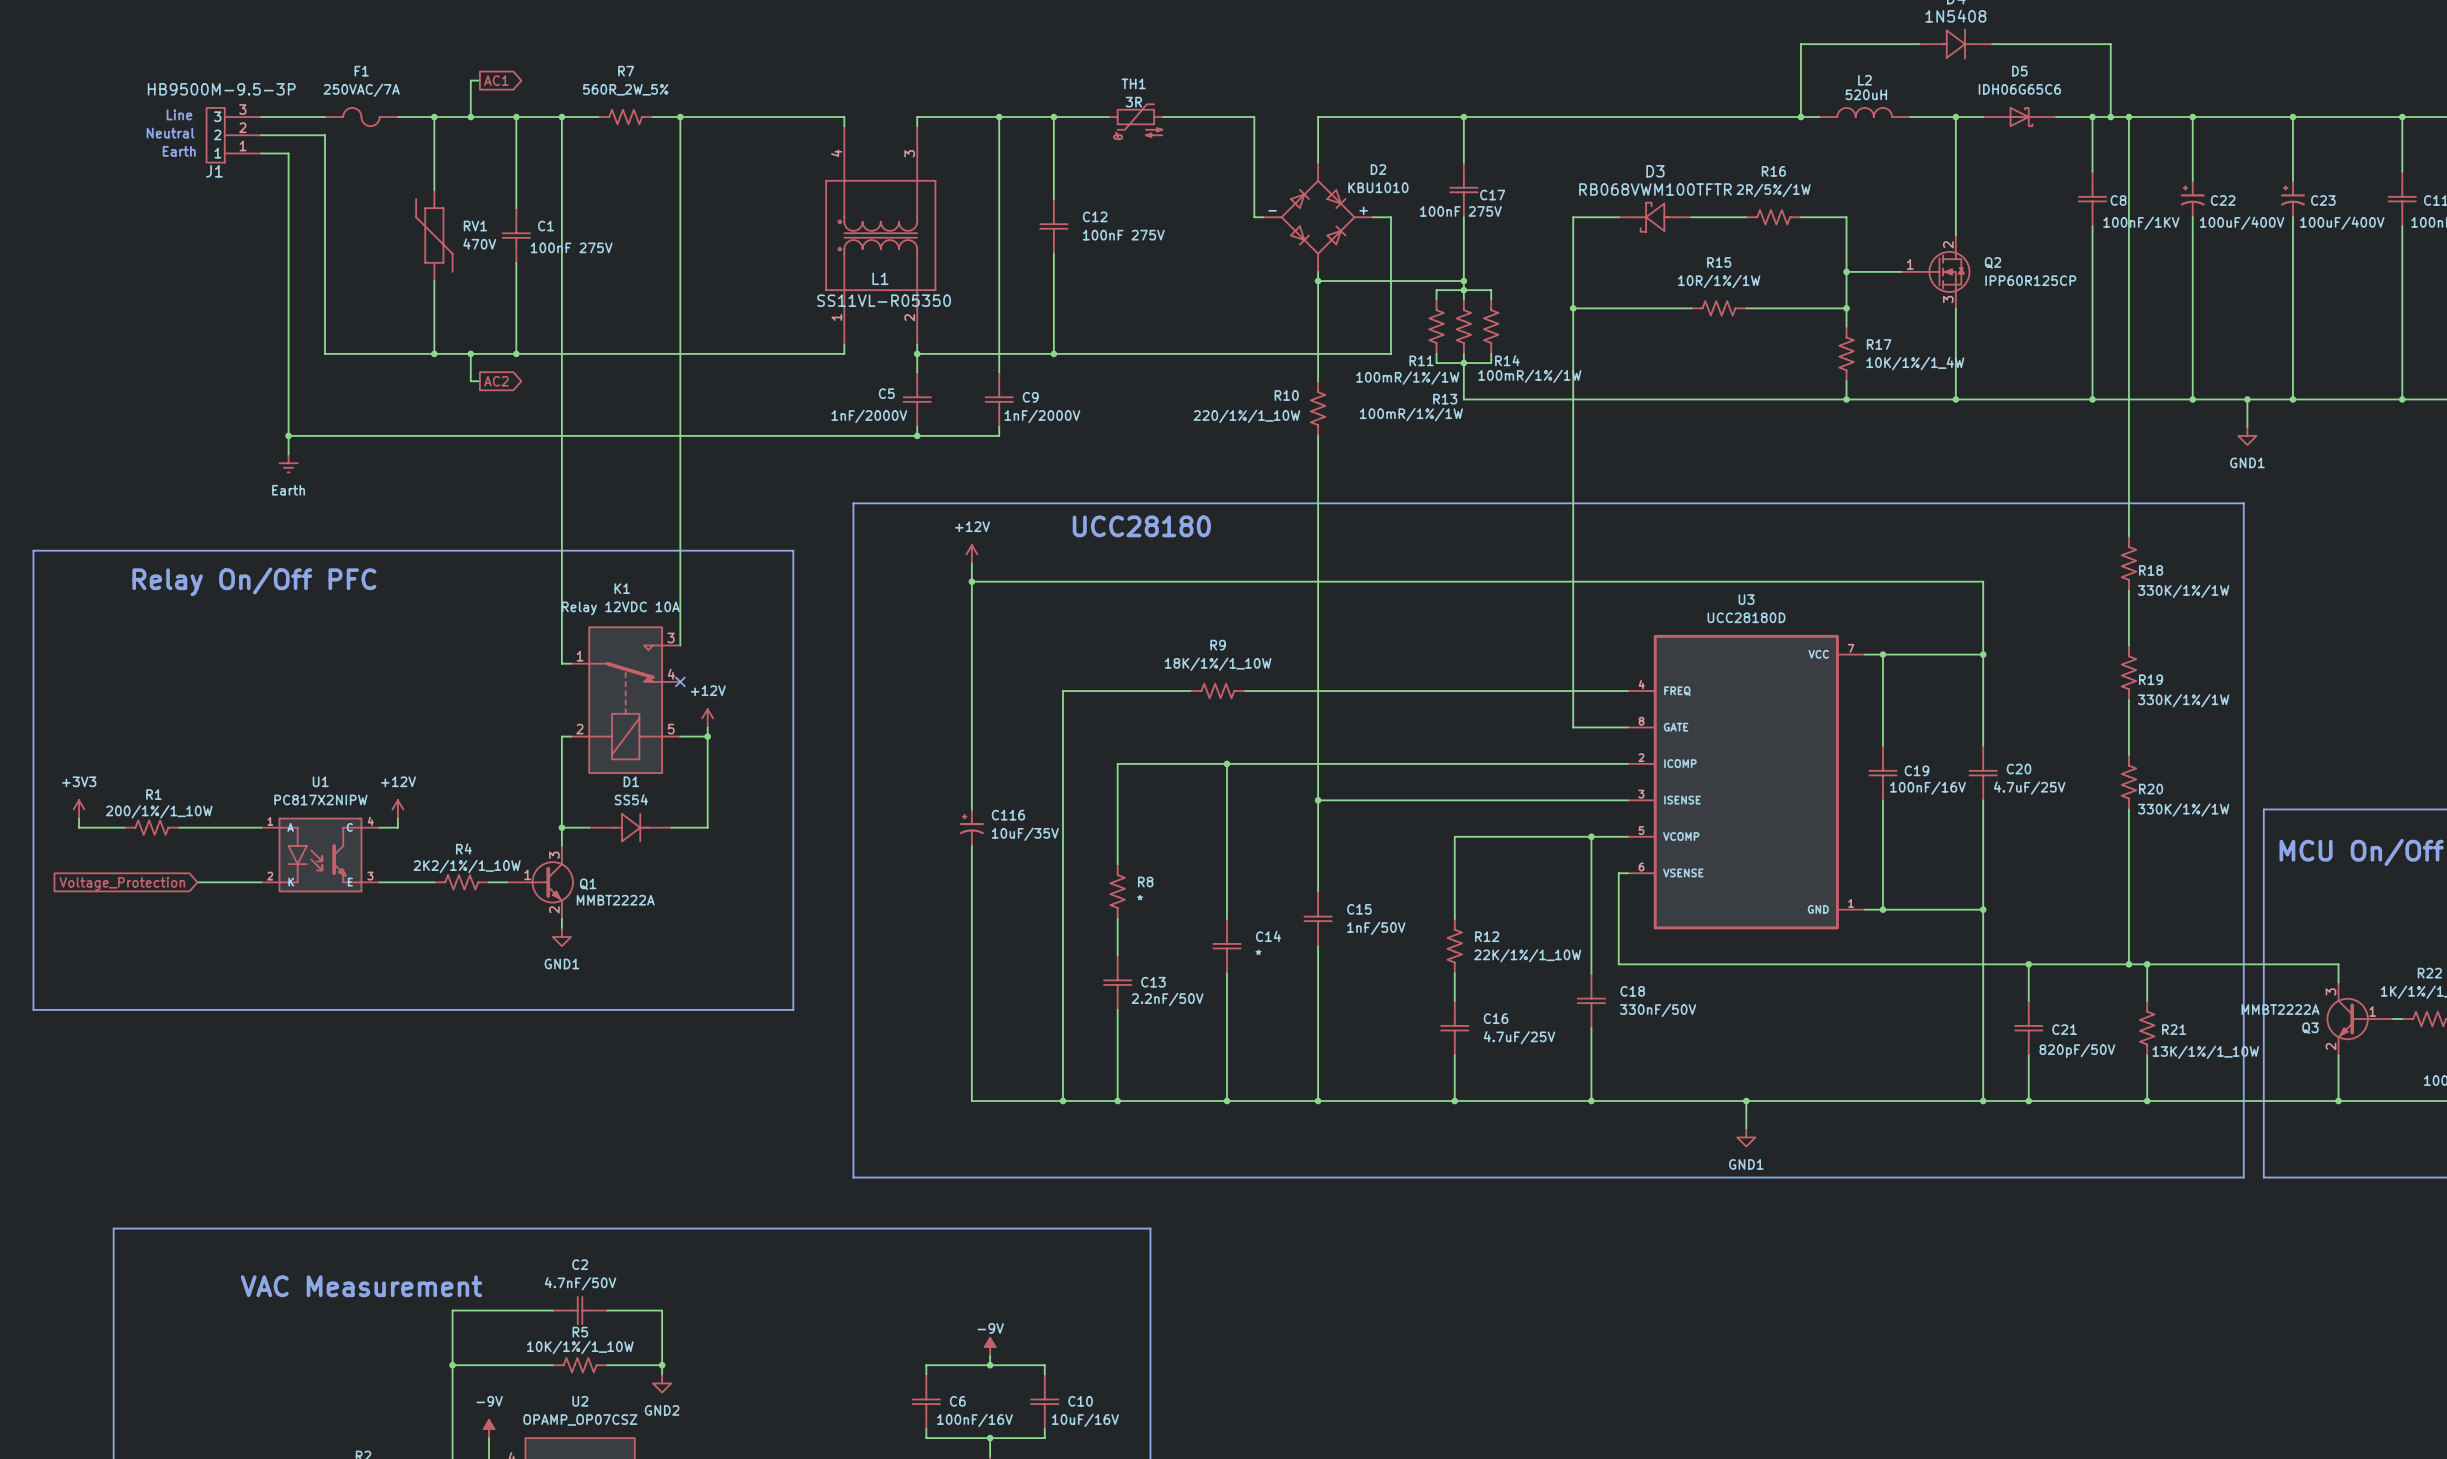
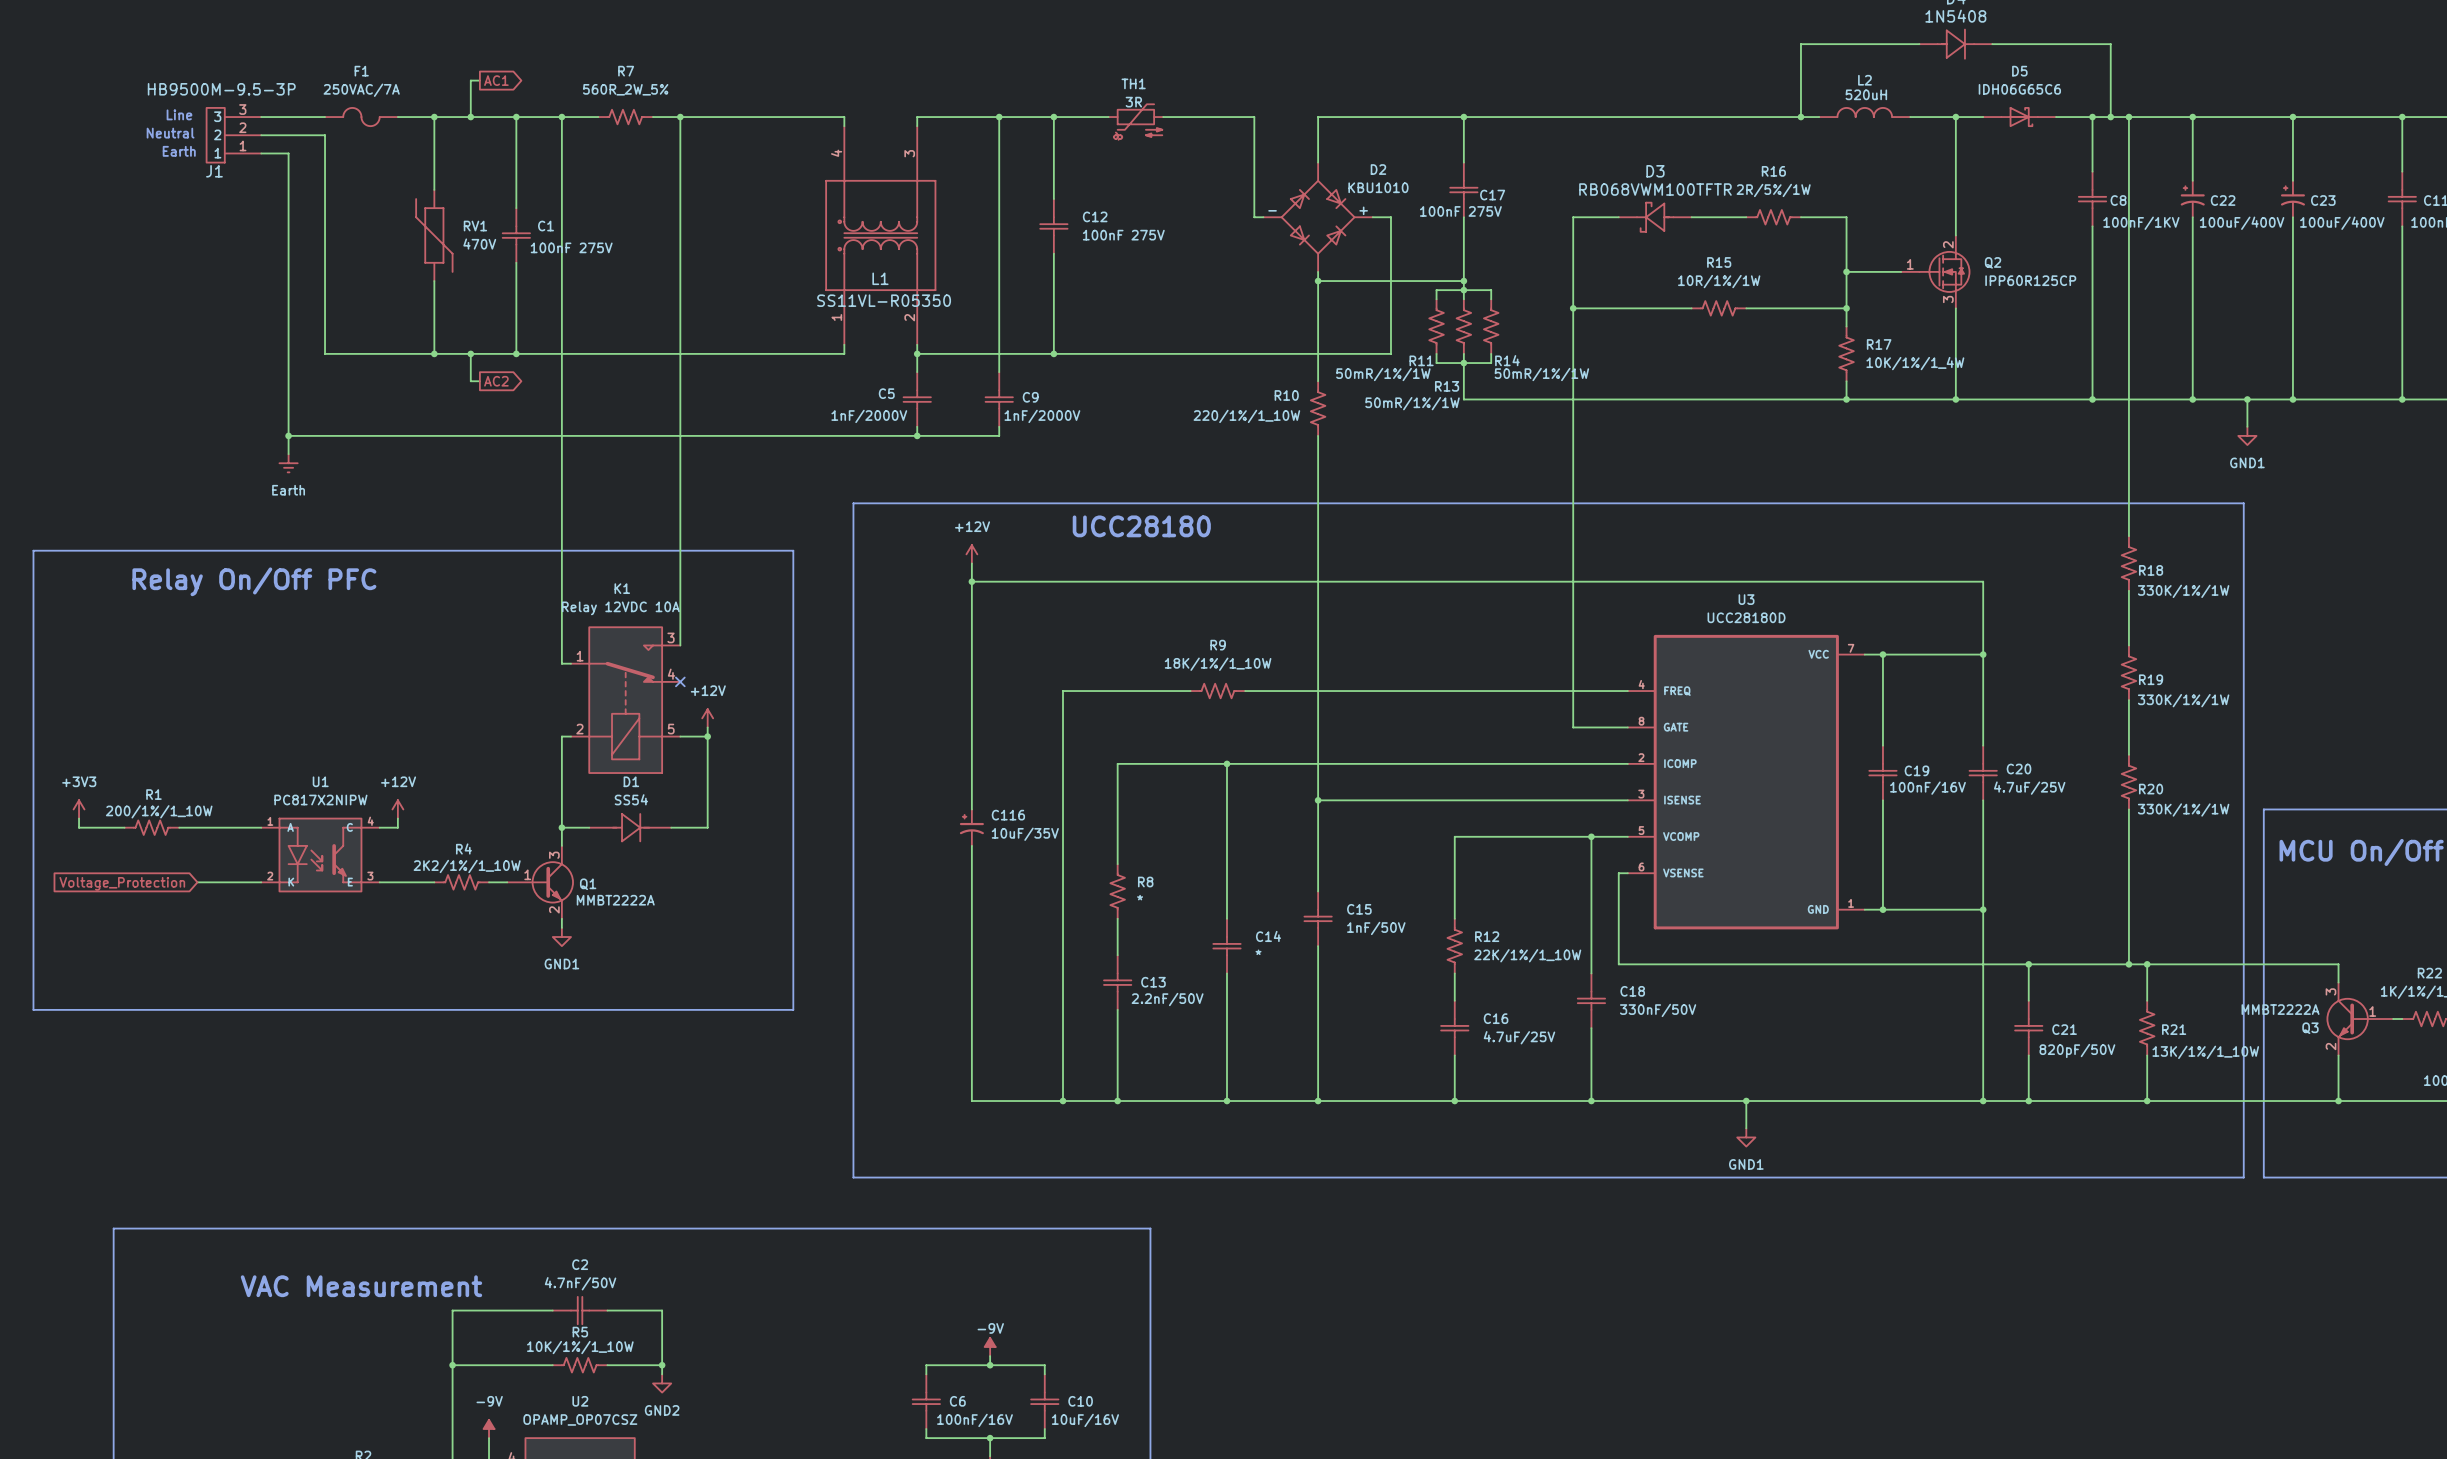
R14 value: 100mR/1%/1W (1529, 376) -> 50mR/1%/1W (1541, 374)
R11 value: 100mR/1%/1W (1407, 378) -> 50mR/1%/1W (1383, 374)
R13 name position: R13 (1445, 399) -> R13 (1447, 386)
R13 value: 100mR/1%/1W (1411, 414) -> 50mR/1%/1W (1412, 403)

